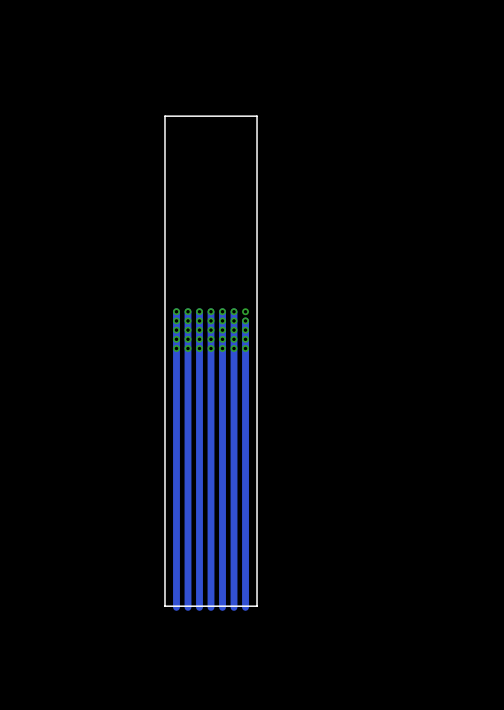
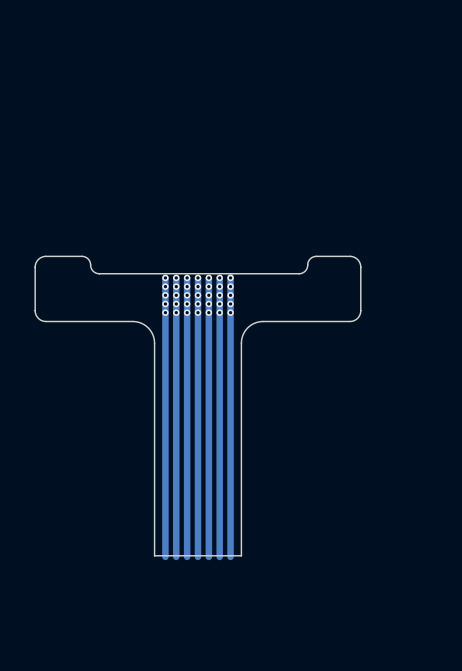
track: none -> (230, 277) (230, 284)
board edge: (257, 380) (257, 116) (164, 116) (164, 380) -> (241, 343) (246, 329) (258, 322) (349, 321) (355, 319) (360, 310) (360, 267) (358, 260) (350, 256) (314, 256) (308, 260) (305, 270) (299, 273) (99, 273) (93, 271) (89, 260) (84, 256) (45, 256) (37, 260) (35, 267) (35, 310) (40, 319) (46, 321) (138, 322) (150, 329) (154, 343)

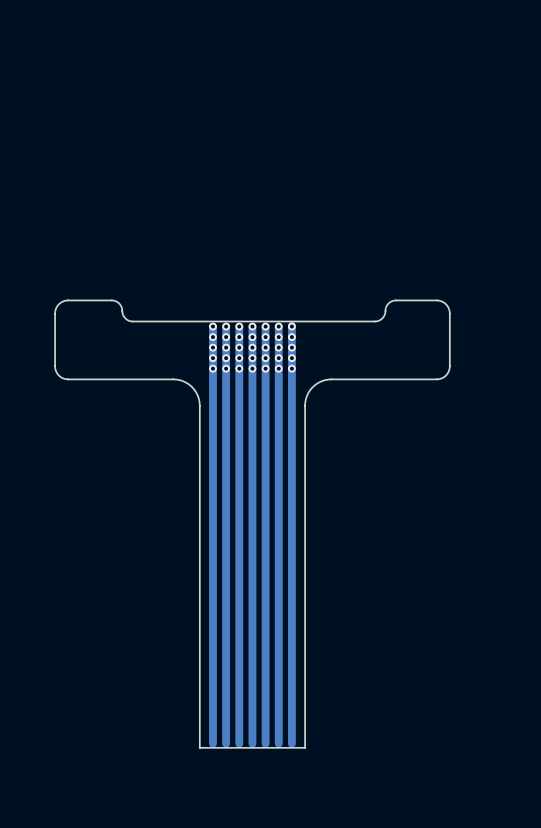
board edge: (241, 555) (154, 555) -> (305, 663) (305, 747) (199, 747) (199, 663)
track: none -> (212, 664) (212, 743)
track: none -> (226, 664) (226, 743)
track: none -> (239, 664) (239, 743)
track: none -> (252, 664) (252, 743)
track: none -> (265, 664) (265, 743)
track: none -> (278, 664) (278, 743)
track: none -> (291, 664) (291, 743)

